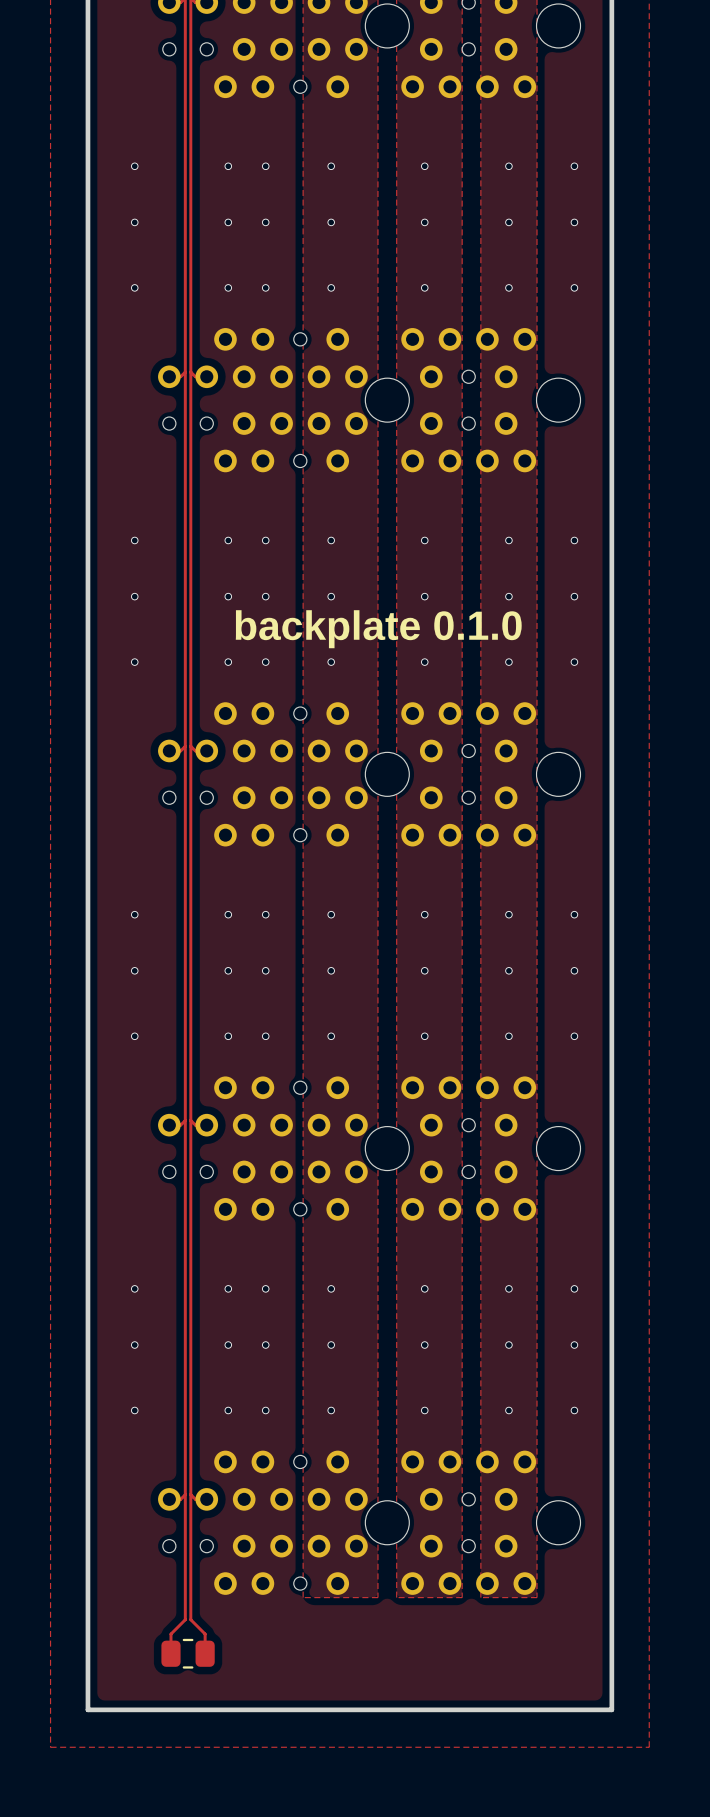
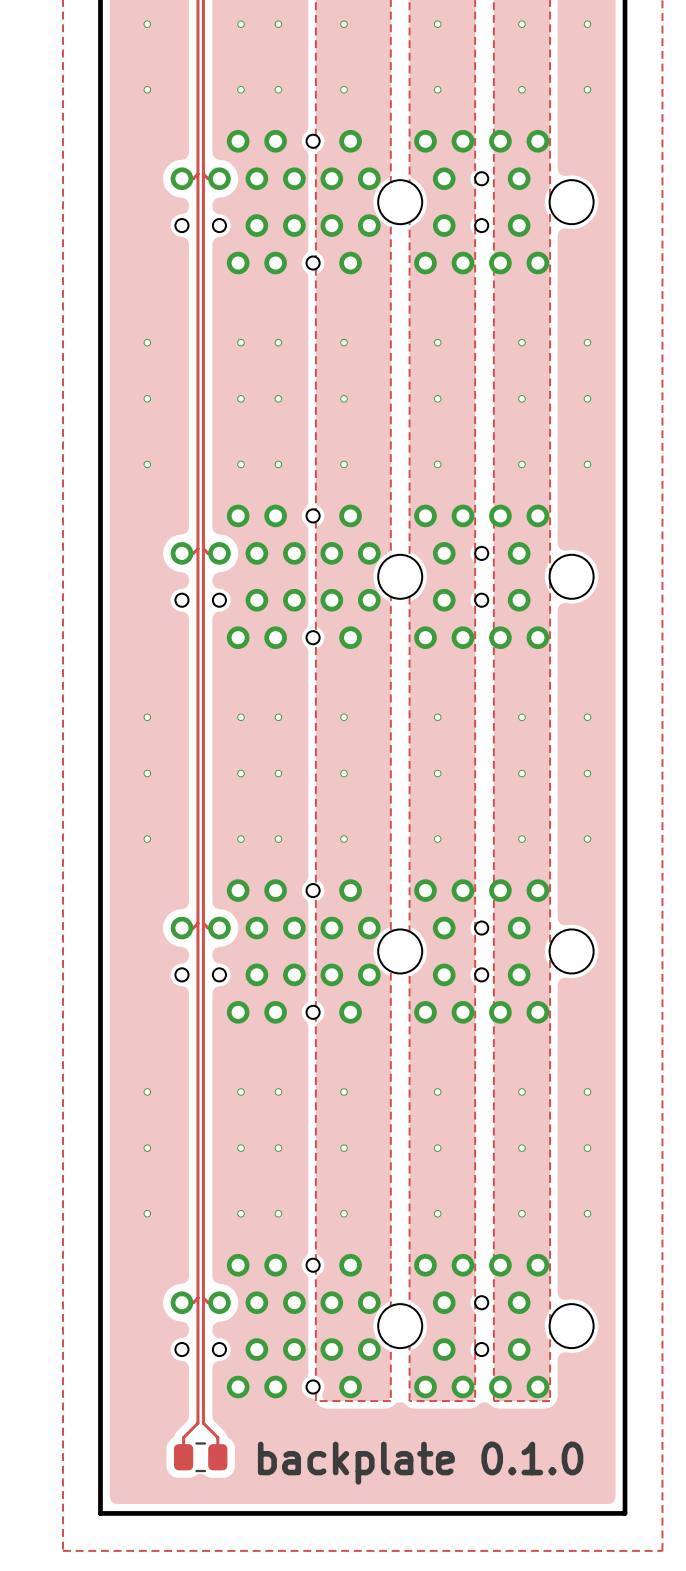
text: backplate 0.1.0 (378, 629) -> none
text: none -> backplate 0.1.0 (420, 1463)

